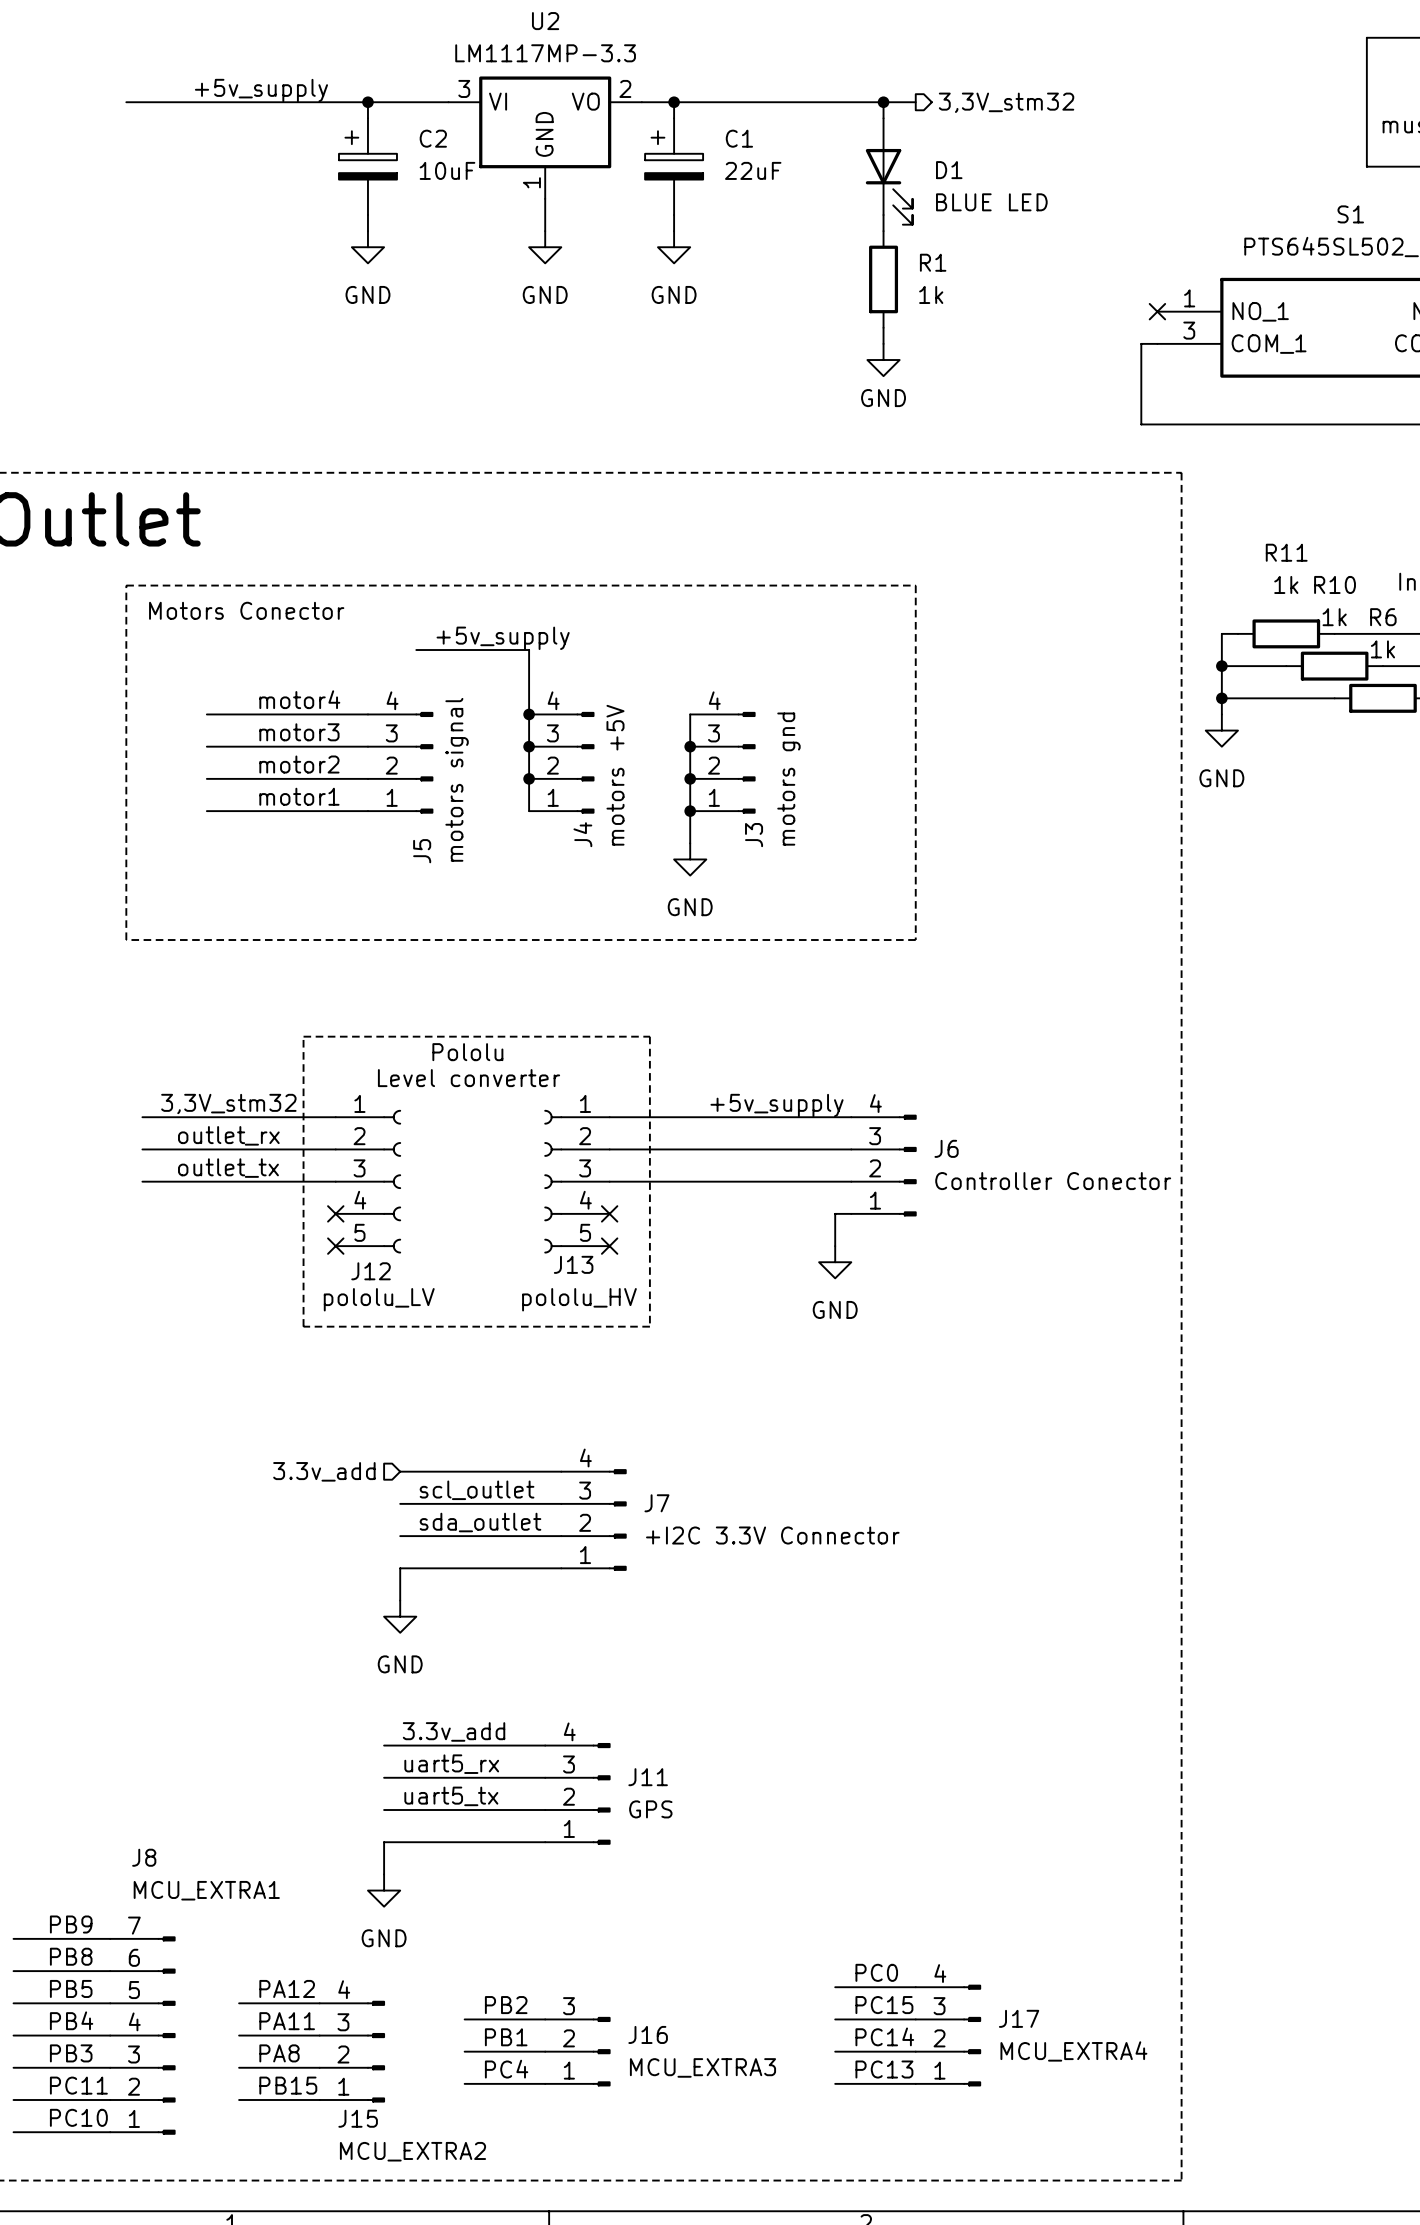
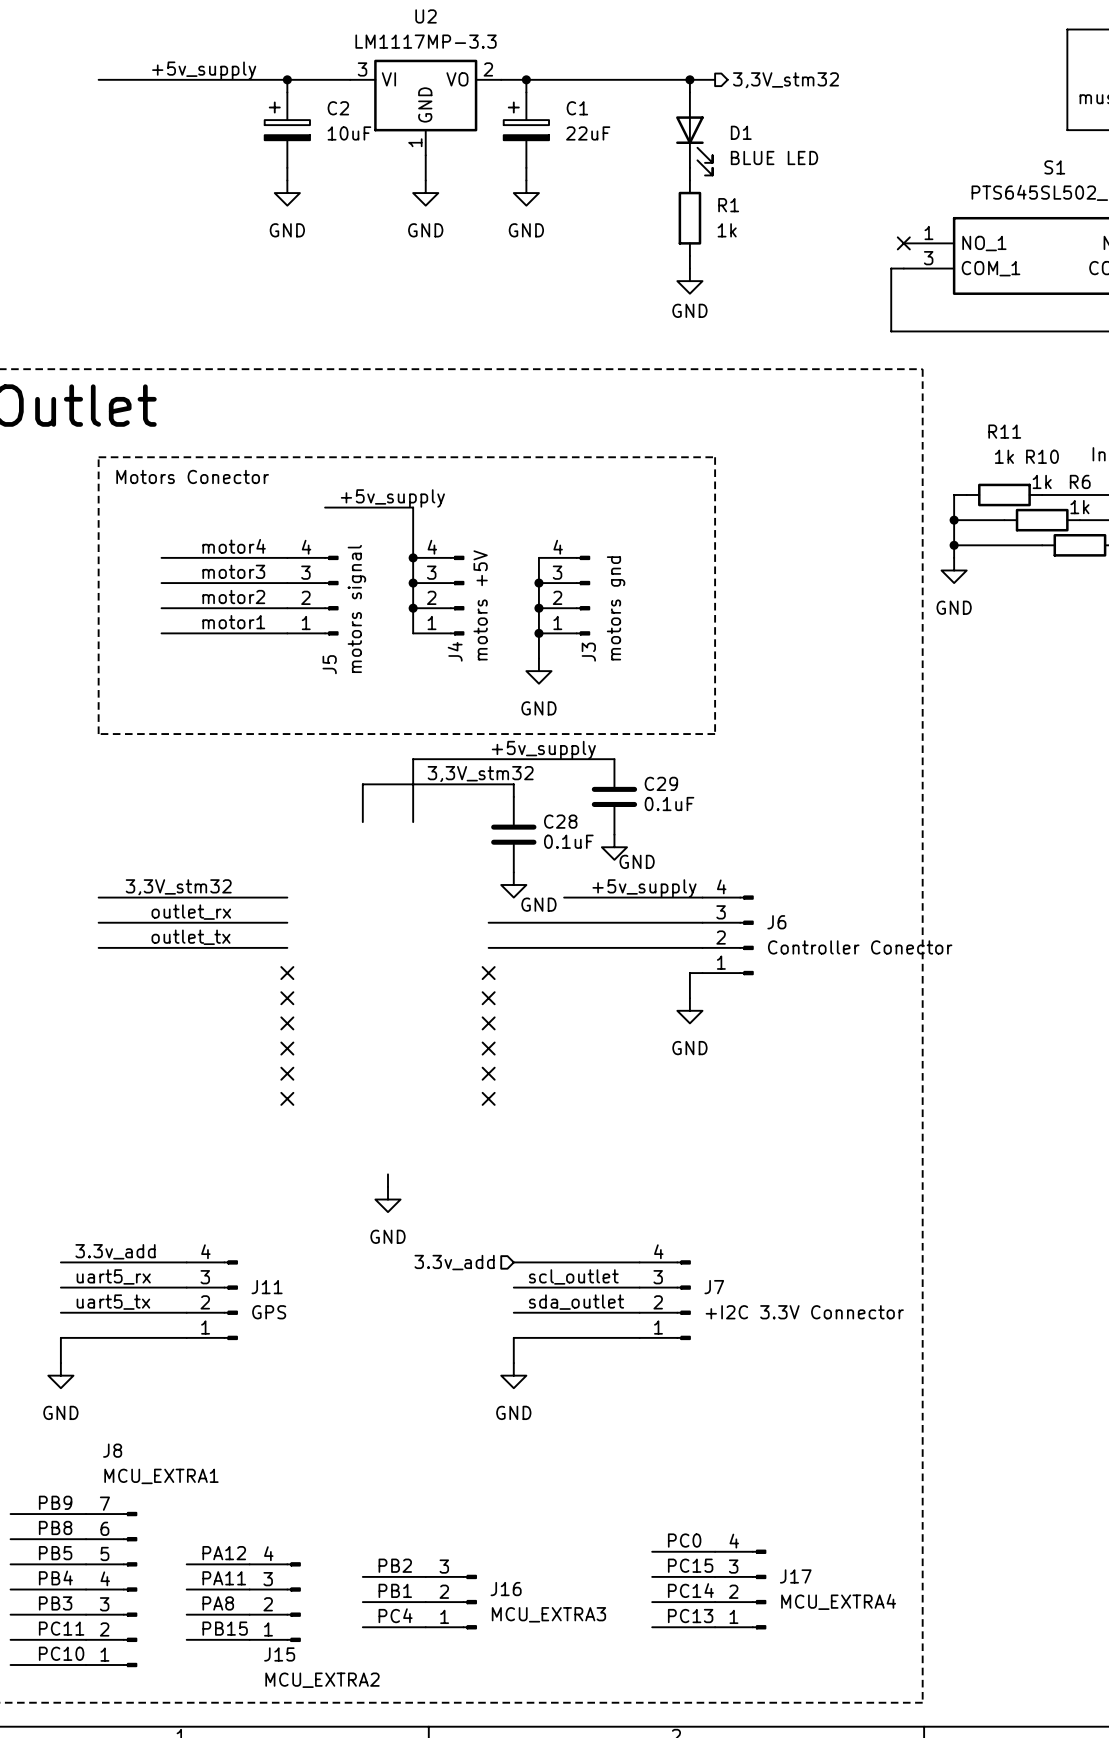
label: none -> +5v_supply (543, 750)
wire: none -> (614, 759) (413, 759) (413, 822)
label: none -> 3,3V_stm32 (480, 774)
wire: none -> (513, 796) (513, 784) (362, 784) (362, 822)
C29: none -> 0.1uF (614, 796)
line: (303, 1036) (649, 1036) (649, 1326) (303, 1326) (303, 1036) -> none
text: Pololu (467, 1052) -> none
C28: none -> 0.1uF (513, 834)
text: Level converter (469, 1078) -> none
power symbol: none -> GND (614, 847)
label position: 3,3V_stm32 (228, 1104) -> 3,3V_stm32 (178, 887)
label position: +5v_supply (777, 1105) -> +5v_supply (644, 888)
wire: (142, 1117) (335, 1117) -> none
wire: (609, 1117) (851, 1117) -> none
power symbol: none -> GND (513, 884)
label position: outlet_rx (228, 1135) -> outlet_rx (191, 912)
wire: none -> (98, 897) (111, 897)
wire: (609, 1149) (722, 1149) -> none
J6 position: (884, 1165) -> (728, 935)
label position: outlet_tx (228, 1168) -> outlet_tx (190, 937)
wire: none -> (98, 922) (111, 922)
J12: pololu_LV (368, 1181) -> none
J13: pololu_HV (576, 1181) -> none
wire: (609, 1181) (625, 1181) -> none
wire: none -> (98, 947) (287, 947)
no-connect mark: (335, 1213) -> none
no-connect mark: (609, 1213) -> none
wire: (835, 1213) (835, 1246) -> (652, 947) (488, 947)
no-connect mark: (335, 1246) -> none
no-connect mark: none -> (287, 973)
no-connect mark position: (609, 1246) -> (488, 973)
wire: none -> (702, 973) (689, 973) (689, 998)
power symbol position: GND (835, 1262) -> GND (689, 1010)
no-connect mark: none -> (287, 998)
no-connect mark: none -> (488, 998)
no-connect mark: none -> (287, 1023)
no-connect mark: none -> (488, 1023)
no-connect mark: none -> (287, 1048)
no-connect mark: none -> (488, 1048)
no-connect mark: none -> (287, 1073)
no-connect mark: none -> (488, 1073)
no-connect mark: none -> (287, 1098)
no-connect mark: none -> (488, 1098)
hierarchical label position: 3.3v_add (324, 1471) -> 3.3v_add (454, 1262)
wire: (400, 1471) (561, 1471) -> (513, 1262) (639, 1262)
label position: scl_outlet (477, 1490) -> scl_outlet (573, 1276)
wire: (400, 1503) (561, 1503) -> (513, 1287) (639, 1287)
wire: none -> (387, 1174) (387, 1186)
J7 position: (594, 1520) -> (665, 1300)
label position: sda_outlet (480, 1522) -> sda_outlet (576, 1302)
wire: (400, 1536) (561, 1536) -> (513, 1312) (639, 1312)
wire: (561, 1568) (400, 1568) (400, 1600) -> (639, 1337) (513, 1337) (513, 1363)
label: none -> 3.3v_add (115, 1251)
wire: none -> (60, 1262) (186, 1262)
power symbol position: GND (400, 1616) -> GND (387, 1199)
label: none -> uart5_rx (113, 1276)
wire: none -> (60, 1287) (186, 1287)
label: none -> uart5_tx (113, 1302)
wire: none -> (186, 1337) (60, 1337) (60, 1363)
label: 3.3v_add (454, 1731) -> none
wire: (384, 1745) (545, 1745) -> (60, 1312) (186, 1312)
power symbol: none -> GND (60, 1375)
power symbol: none -> GND (513, 1375)
label: uart5_rx (451, 1764) -> none
wire: (384, 1777) (545, 1777) -> none
J11 position: (577, 1793) -> (212, 1300)
label: uart5_tx (451, 1796) -> none
wire: (384, 1810) (545, 1810) -> none
wire: (545, 1842) (384, 1842) (384, 1874) -> none
power symbol: GND (384, 1890) -> none

